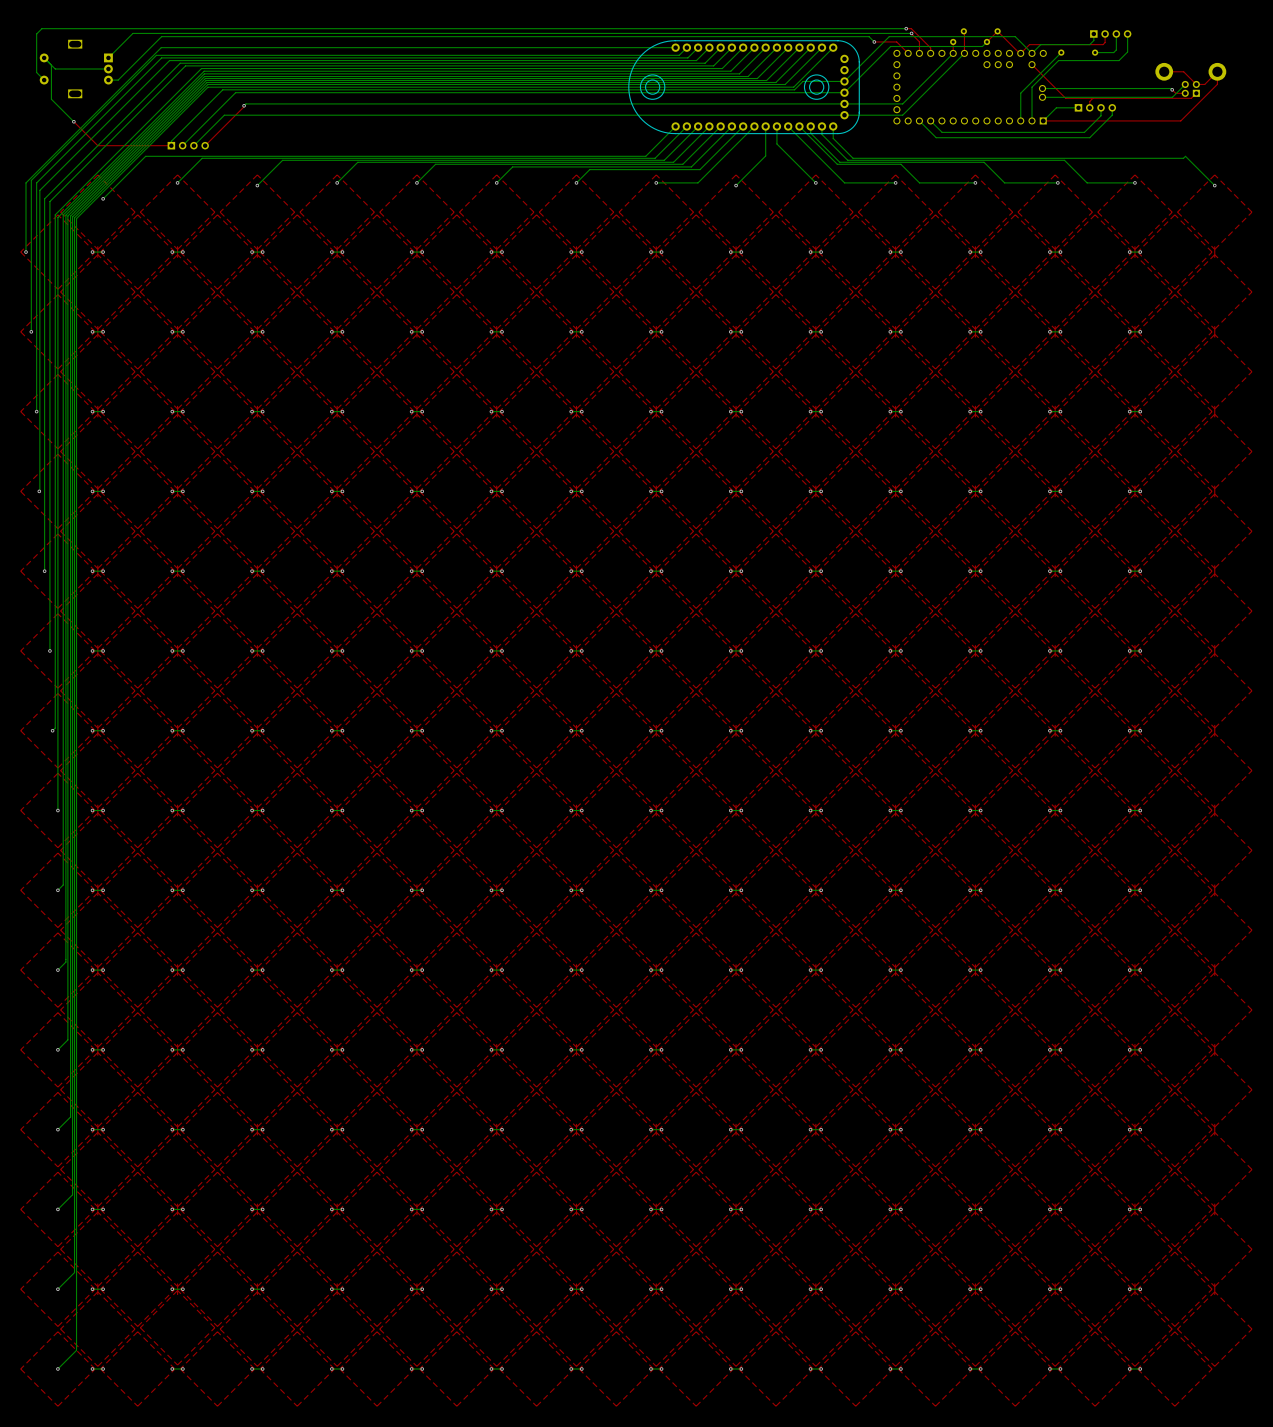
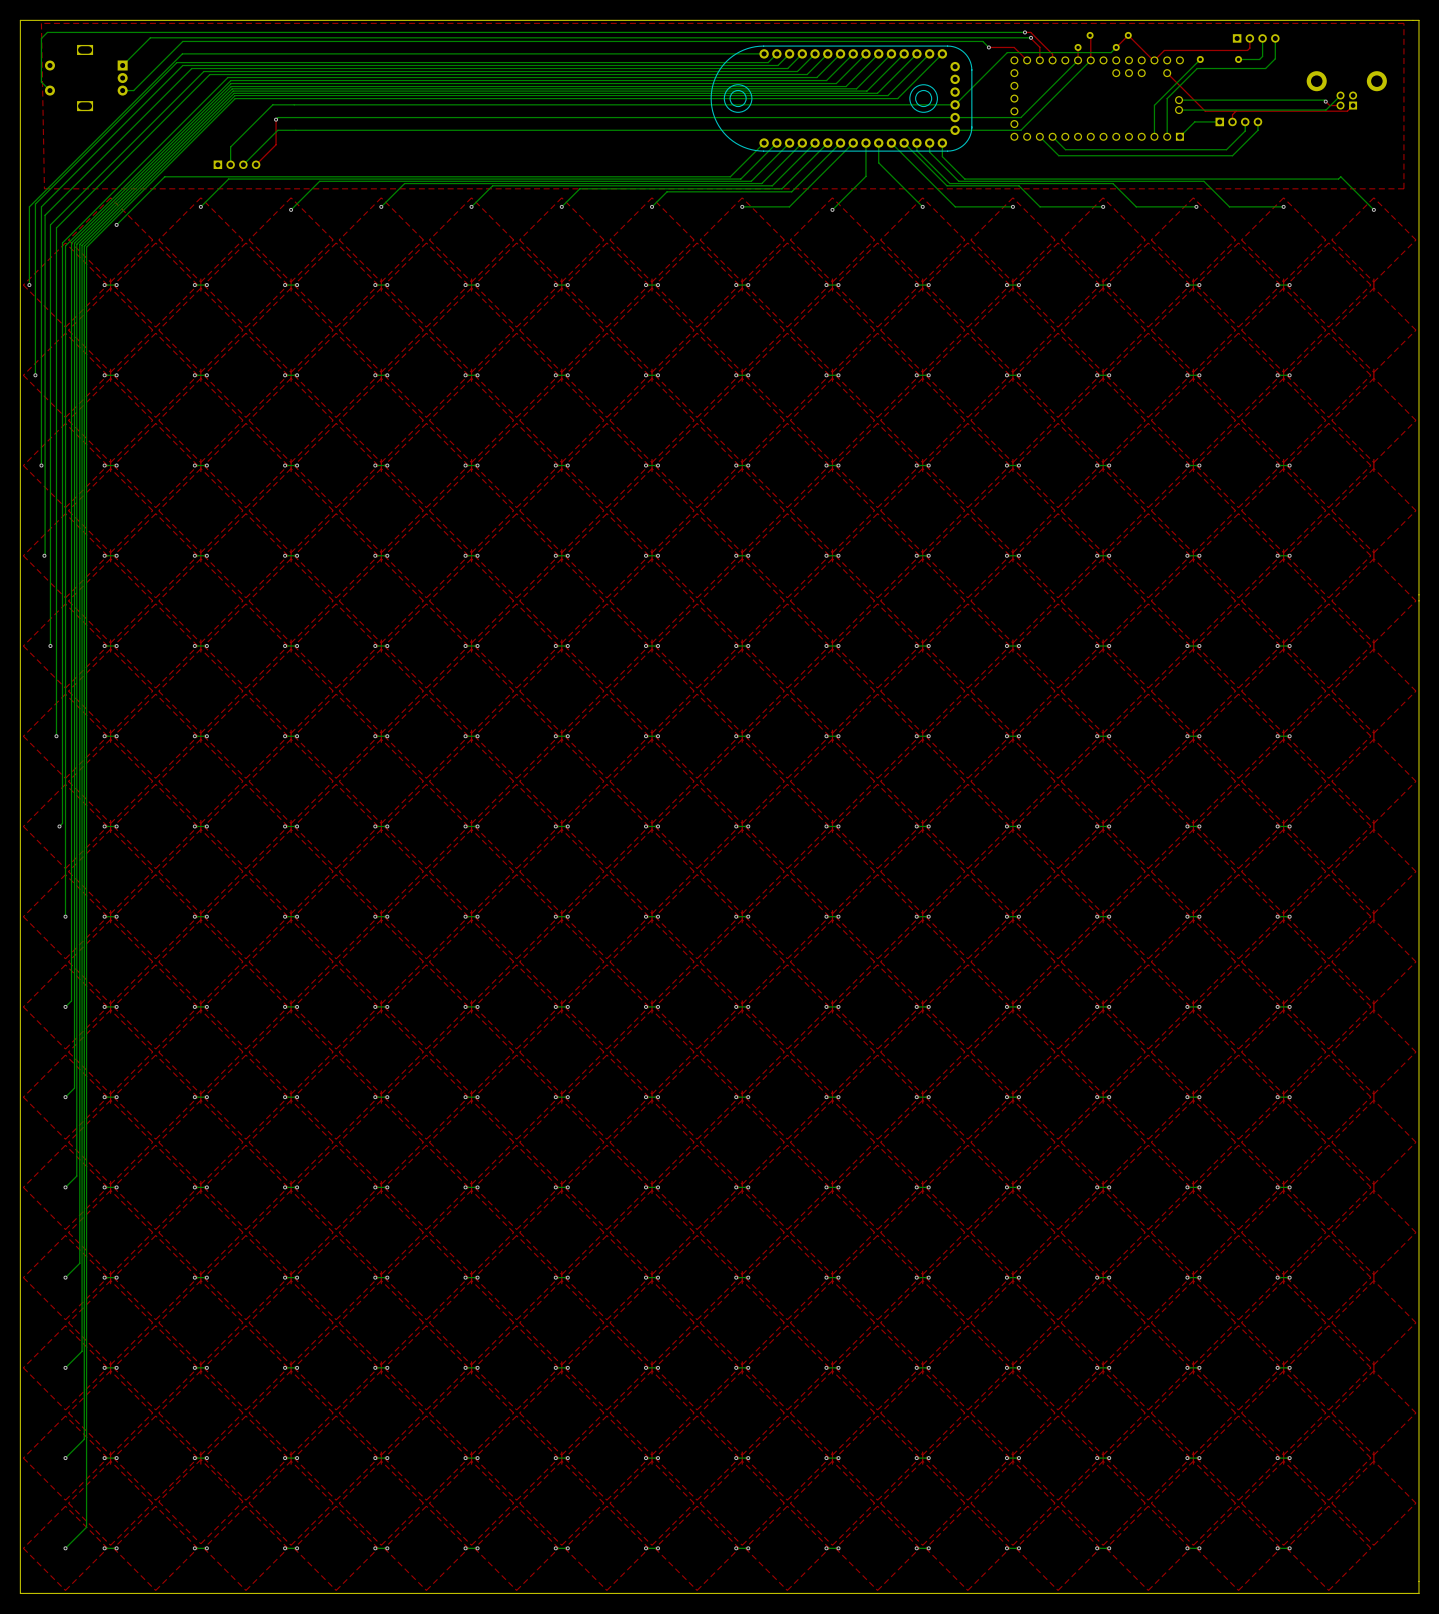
board edge: none -> (1418, 20) (20, 20) (20, 1593) (1418, 1593) (1418, 20)
top zone outline: none -> (1403, 23) (1403, 188) (44, 188) (41, 23) (1403, 23)
bottom track: (1093, 33) (1093, 40) (1089, 44) (1040, 44) (1032, 53) (1015, 36) (889, 36) (844, 81) (802, 81) (794, 89) (222, 89) (171, 141) (171, 145) -> none
bottom track: (44, 57) (55, 69) (108, 69) -> none
bottom track: (51, 65) (51, 99) (73, 121) -> none
top track: (1164, 71) (1183, 71) (1196, 84) (1204, 84) (1217, 71) (1217, 84) (1180, 120) (1043, 120) -> none
bottom track: (241, 92) (235, 92) (182, 145) -> (272, 104) (230, 147) (230, 164)
top track: (244, 106) (205, 145) -> (276, 120) (276, 144) (256, 164)
bottom track: (245, 115) (224, 115) (193, 145) -> (277, 130) (243, 164)
top track: (73, 121) (97, 145) (171, 145) -> none
via: (73, 121) -> none
part position: (188, 145) -> (236, 164)

